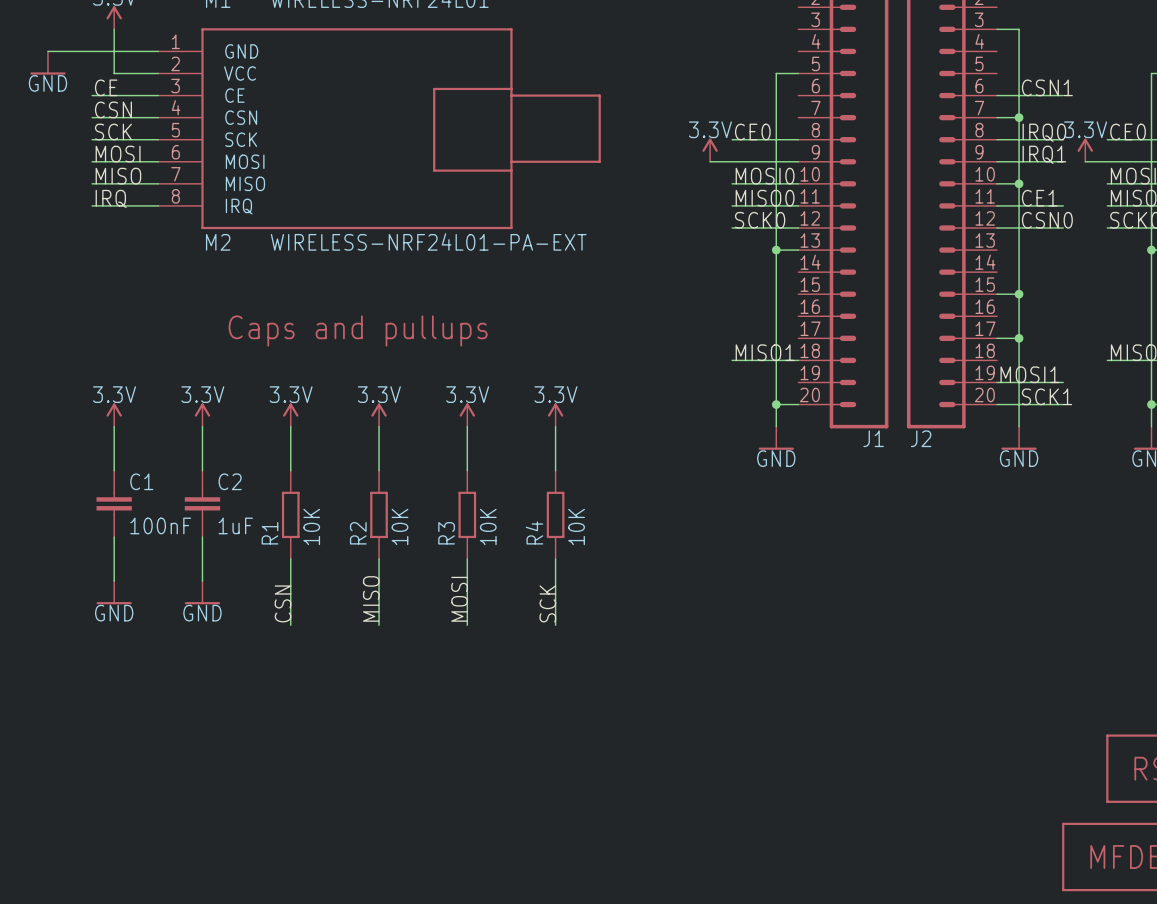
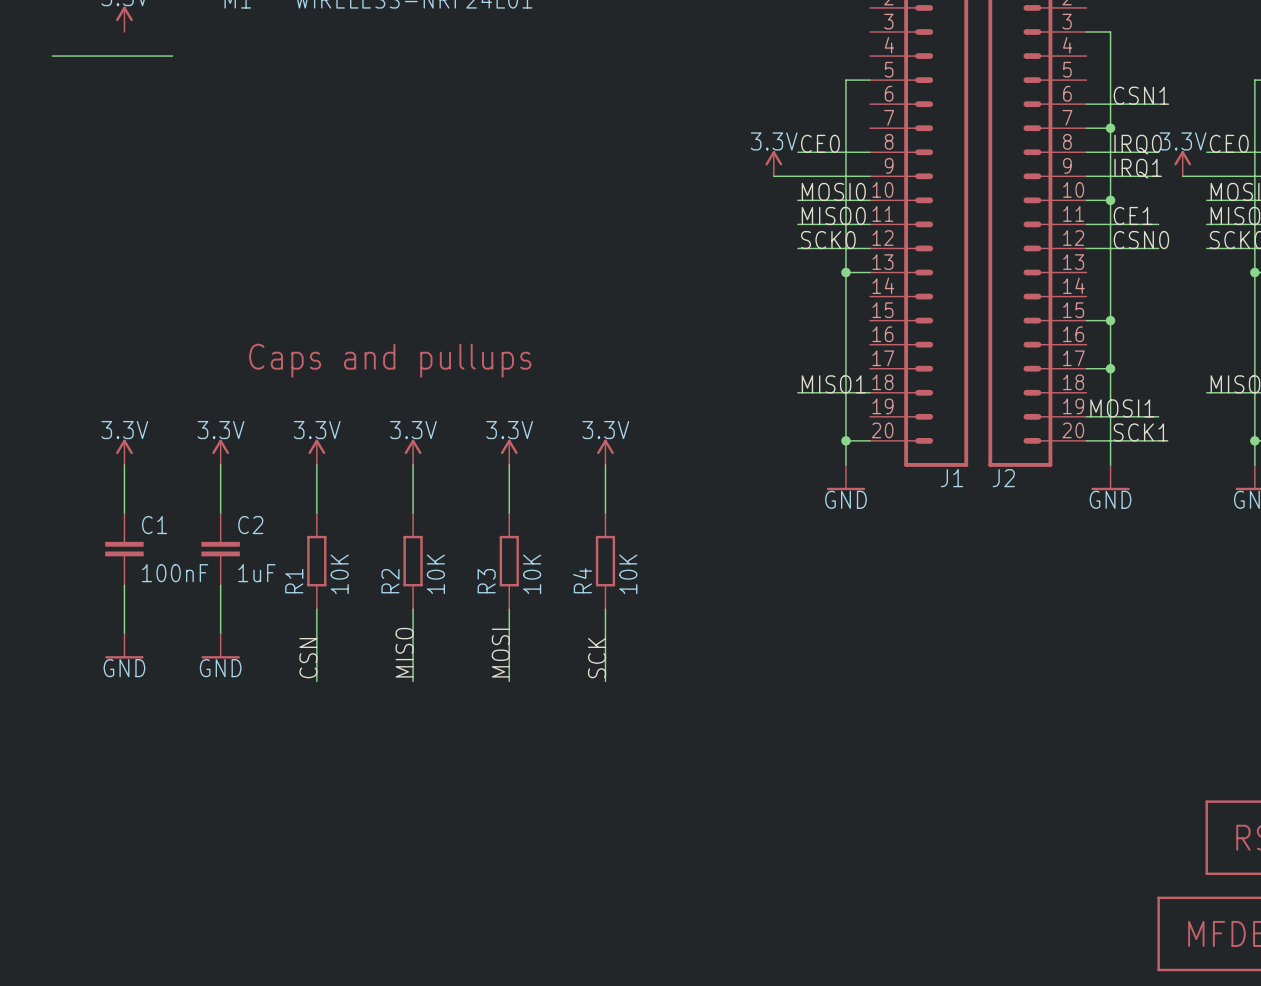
wire: (114, 29) (114, 73) (158, 73) -> none
power symbol: GND (47, 63) -> none
label: CE (106, 87) -> none
wire: (92, 95) (158, 95) -> none
label: CSN (113, 109) -> none
wire: (92, 117) (158, 117) -> none
M2: WIRELESS-NRF24L01-PA-EXT (379, 128) -> none
label: SCK (113, 131) -> none
wire: (92, 139) (158, 139) -> none
label: MOSI (118, 154) -> none
wire: (92, 161) (158, 161) -> none
label: MISO (118, 176) -> none
wire: (92, 183) (158, 183) -> none
label: IRQ (111, 198) -> none
wire: (92, 205) (158, 205) -> none

